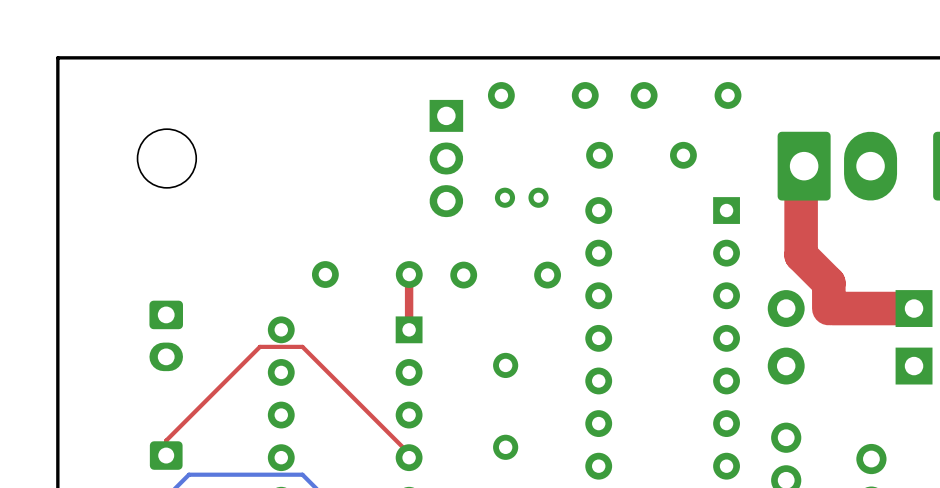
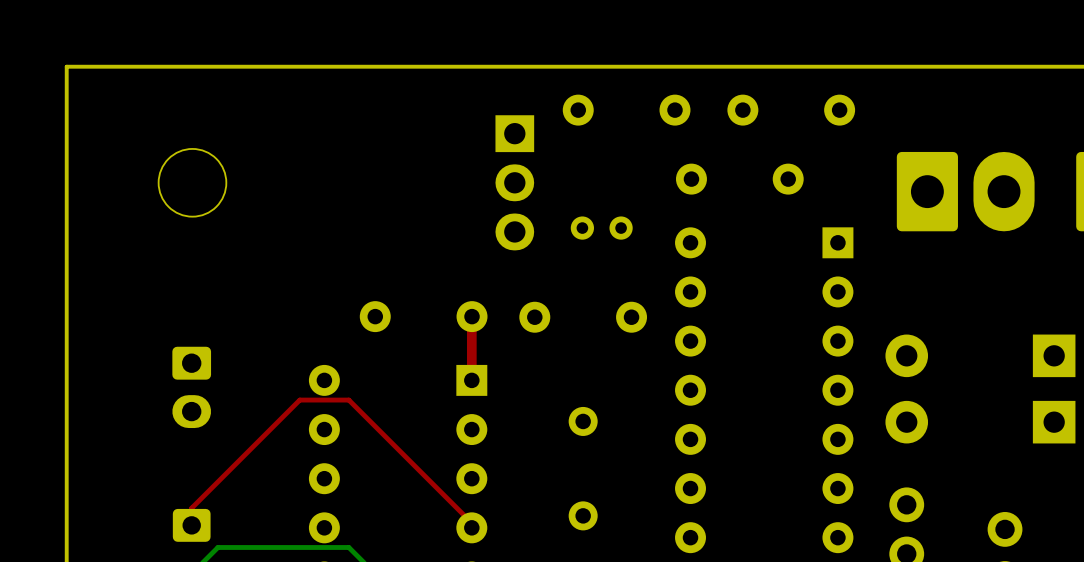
top track: (801, 169) (801, 255) (828, 282) (828, 308) -> none
top track: (914, 308) (832, 308) -> none

